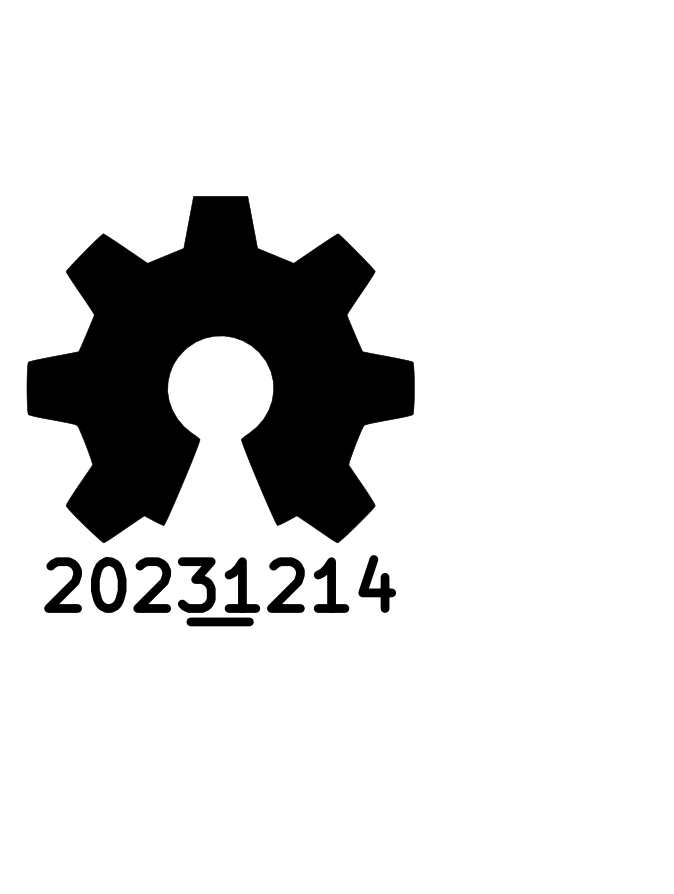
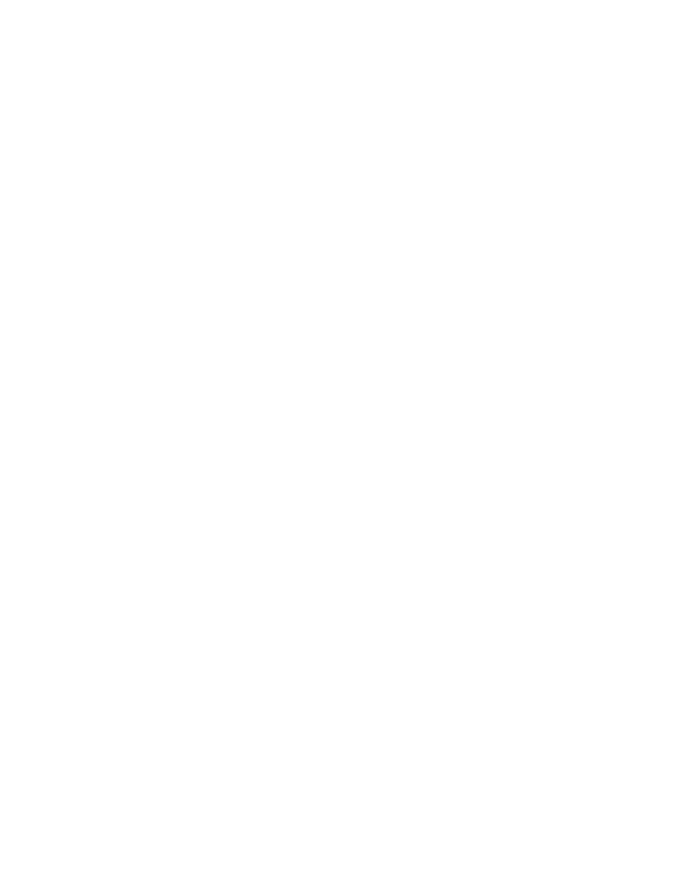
drawing: [26, 196, 415, 627] -> none

